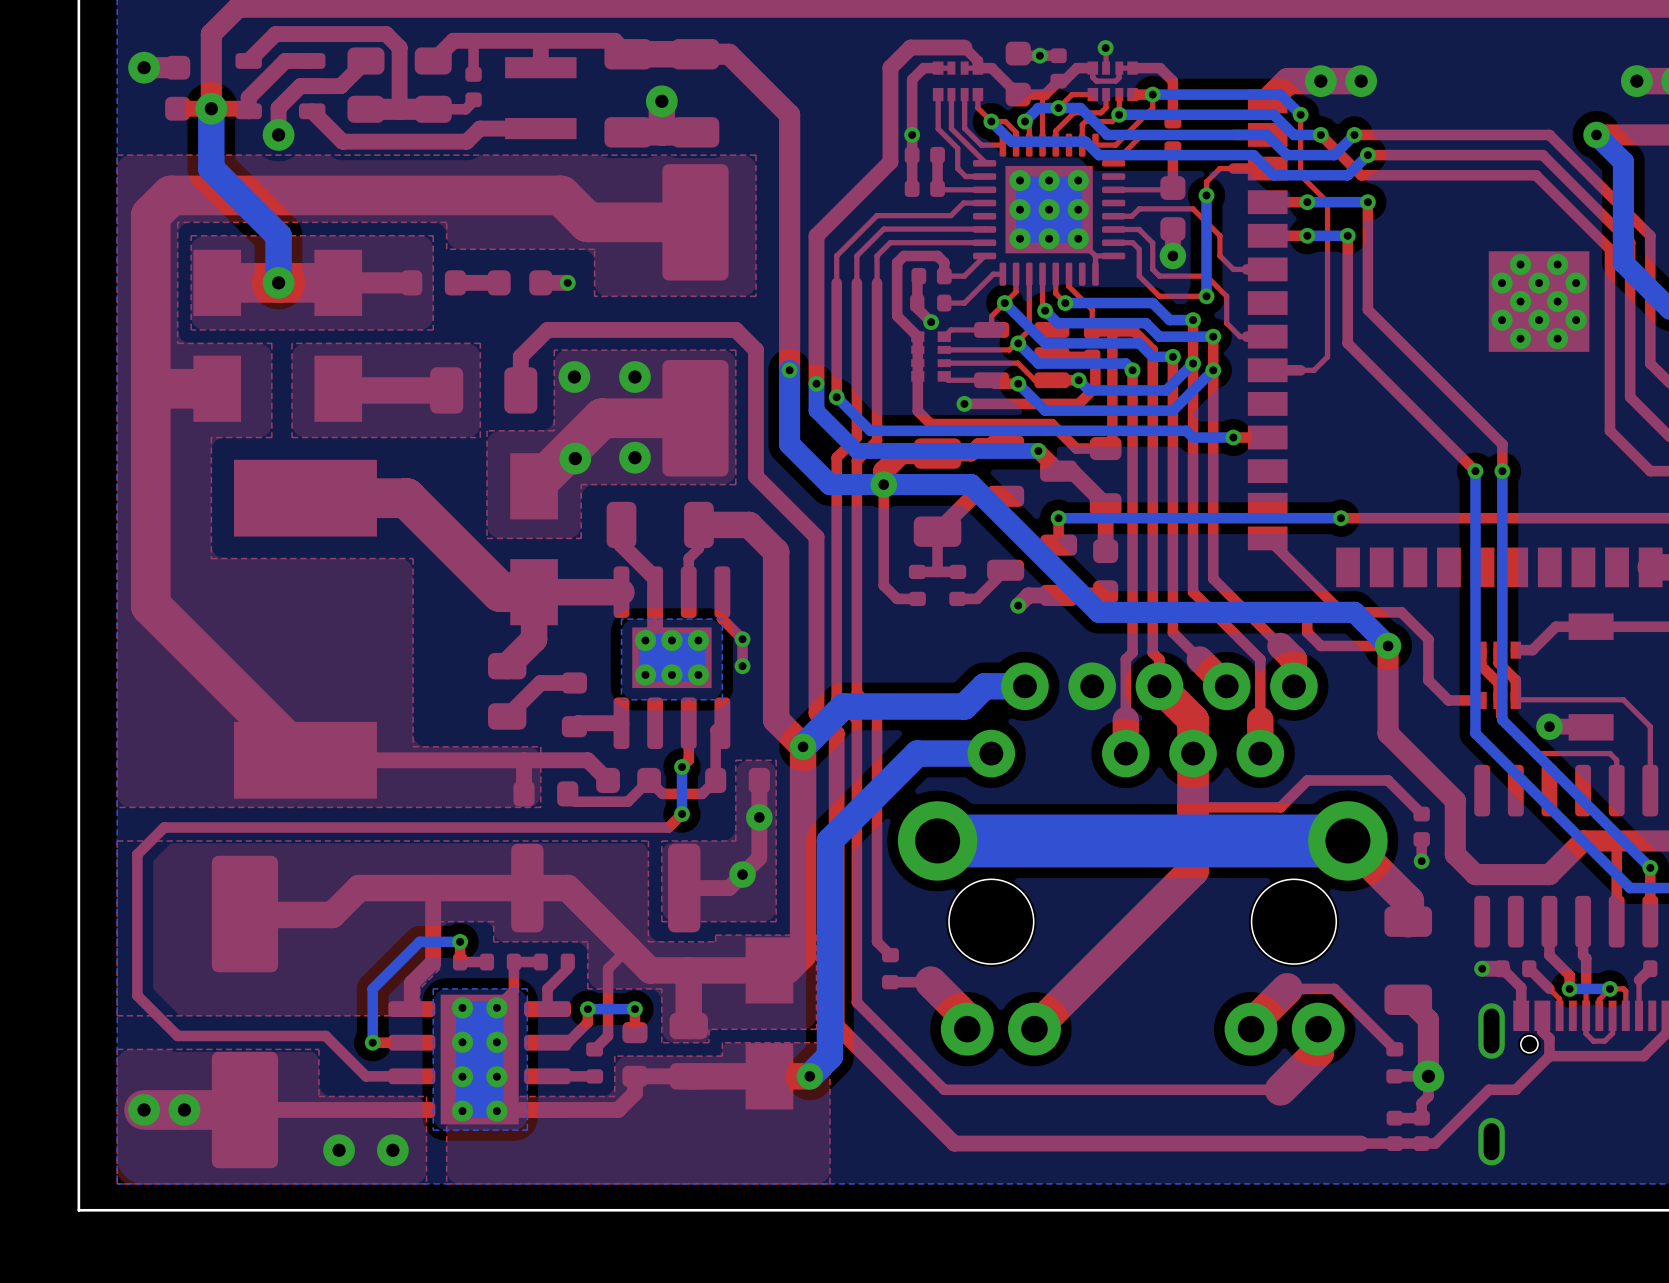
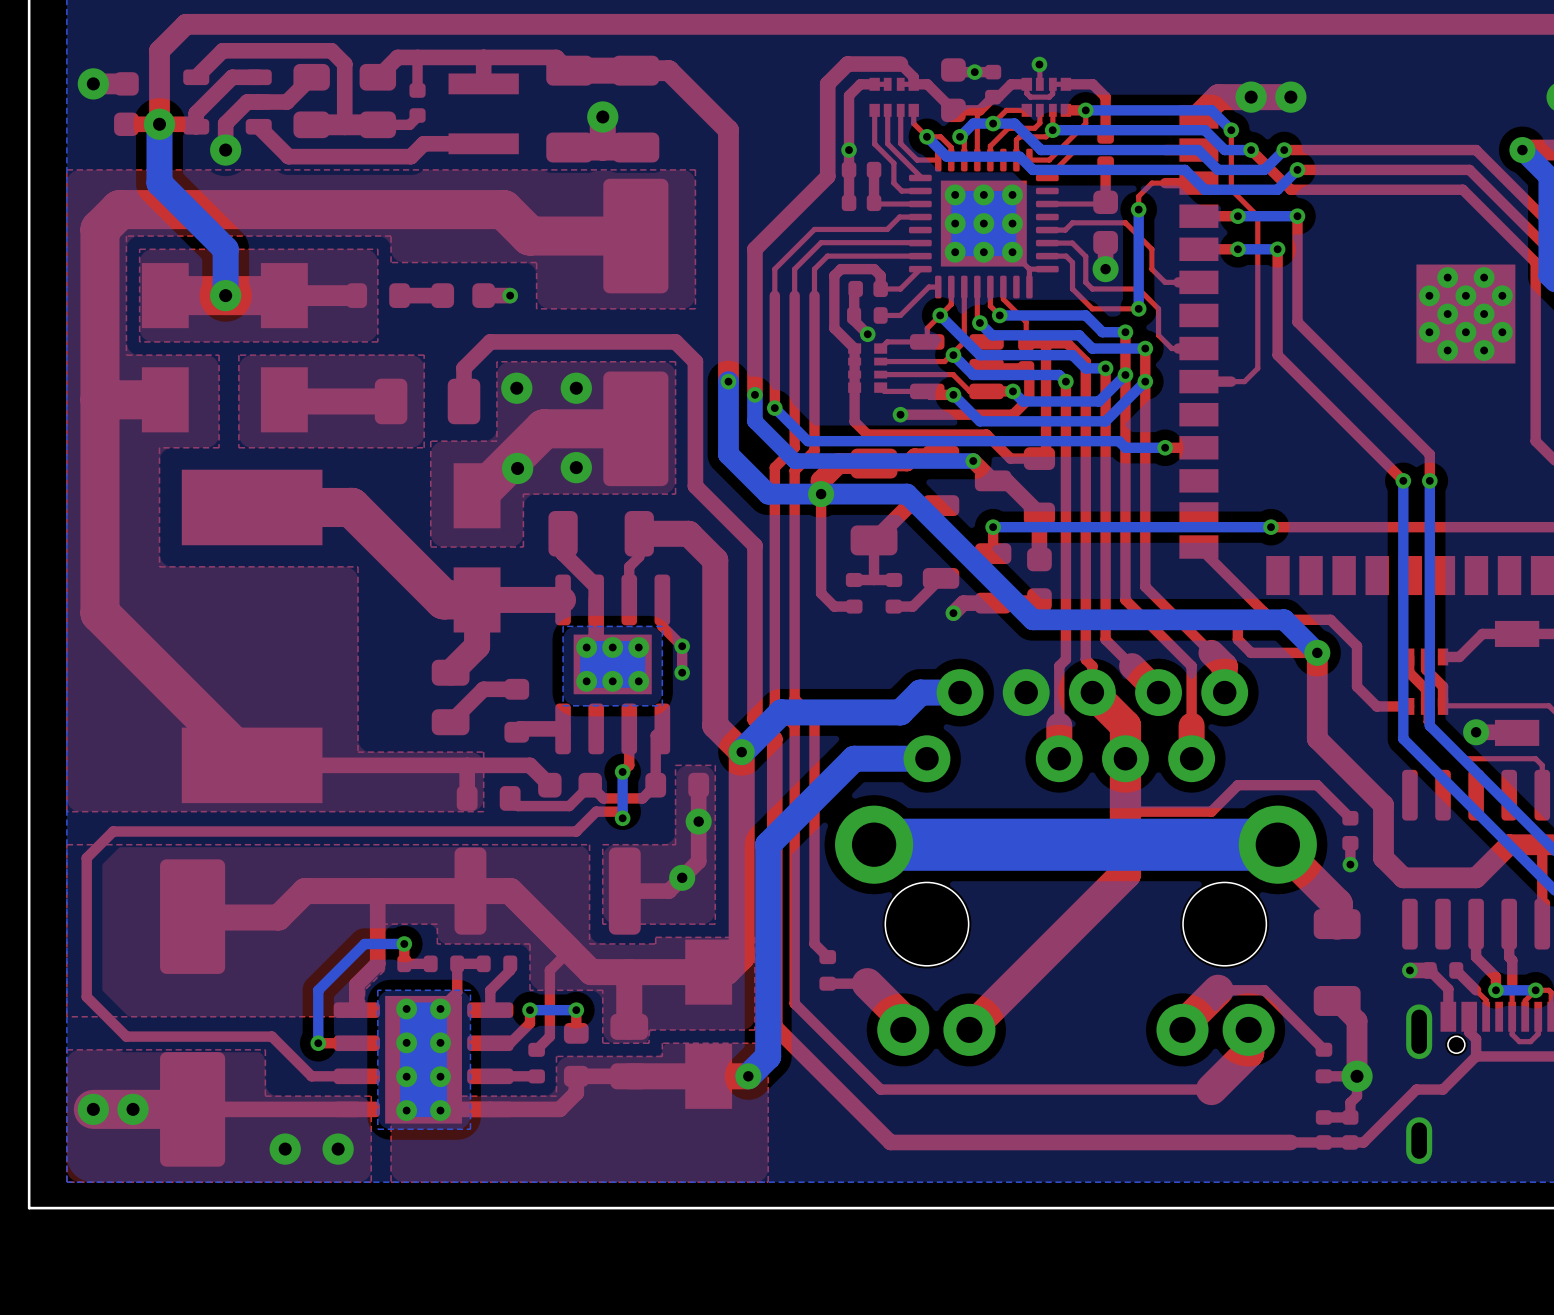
top track: (682, 814) (668, 827) (634, 827) -> (622, 811) (596, 811) (576, 831)

